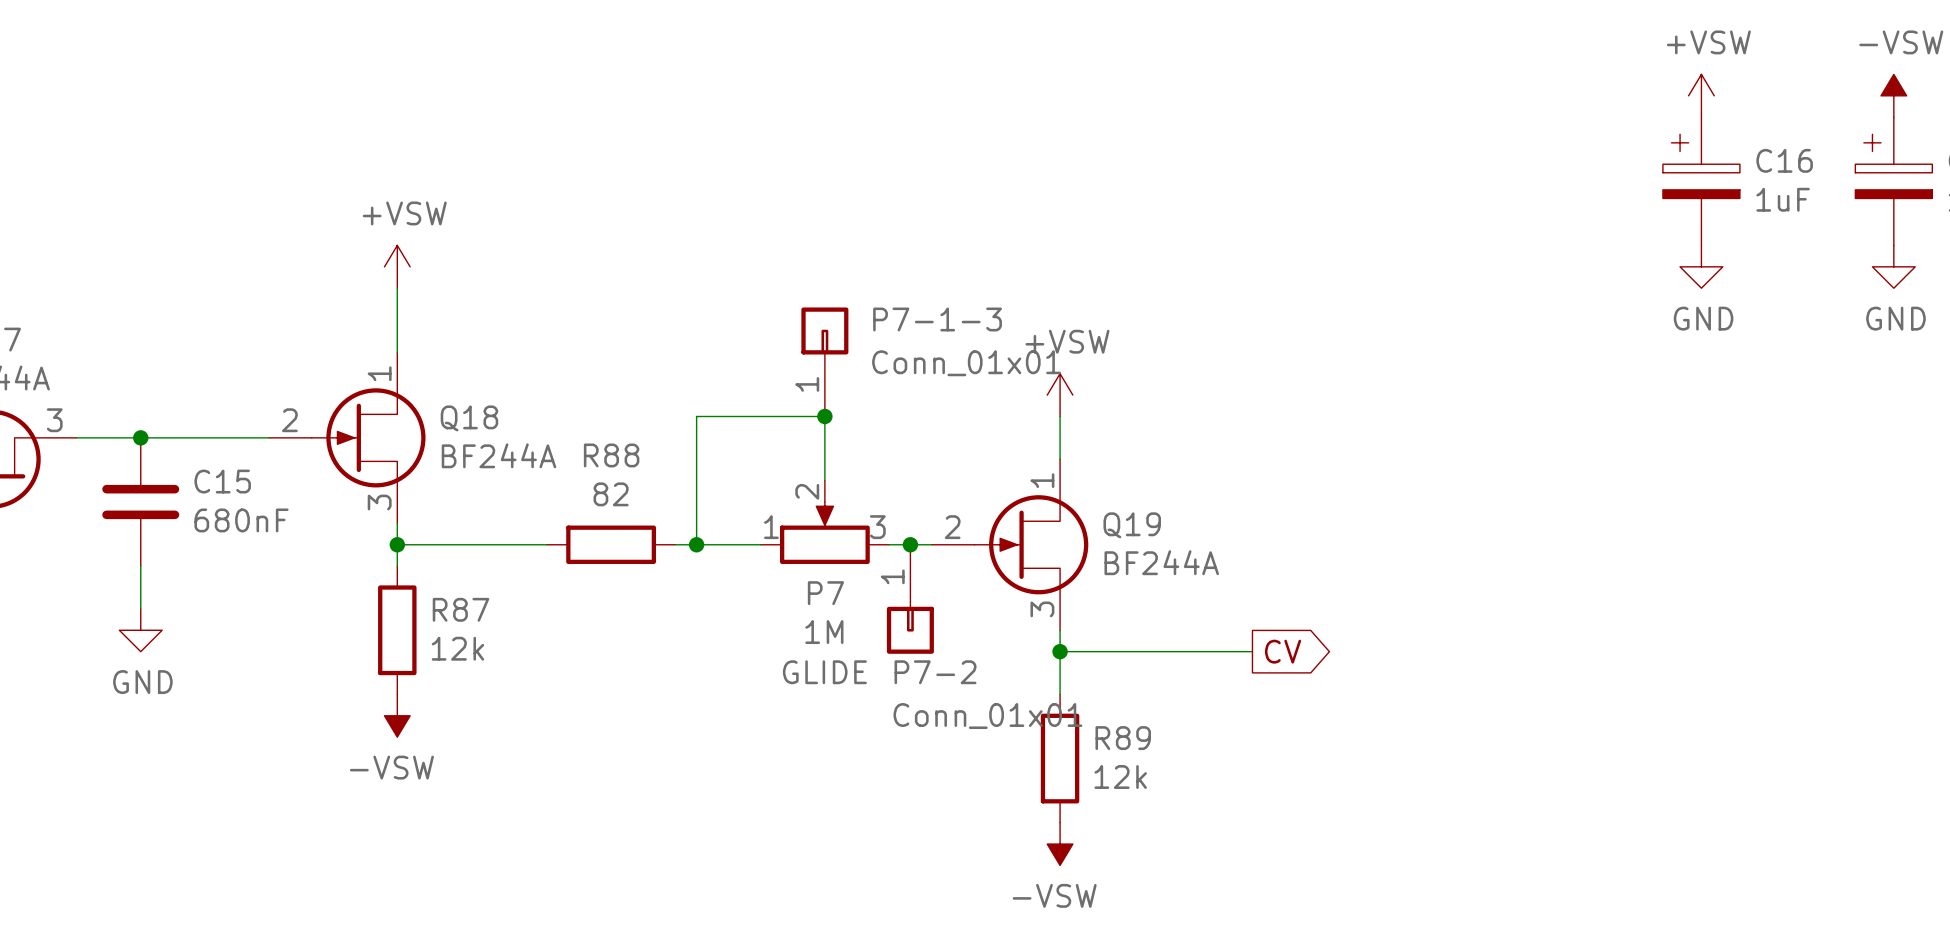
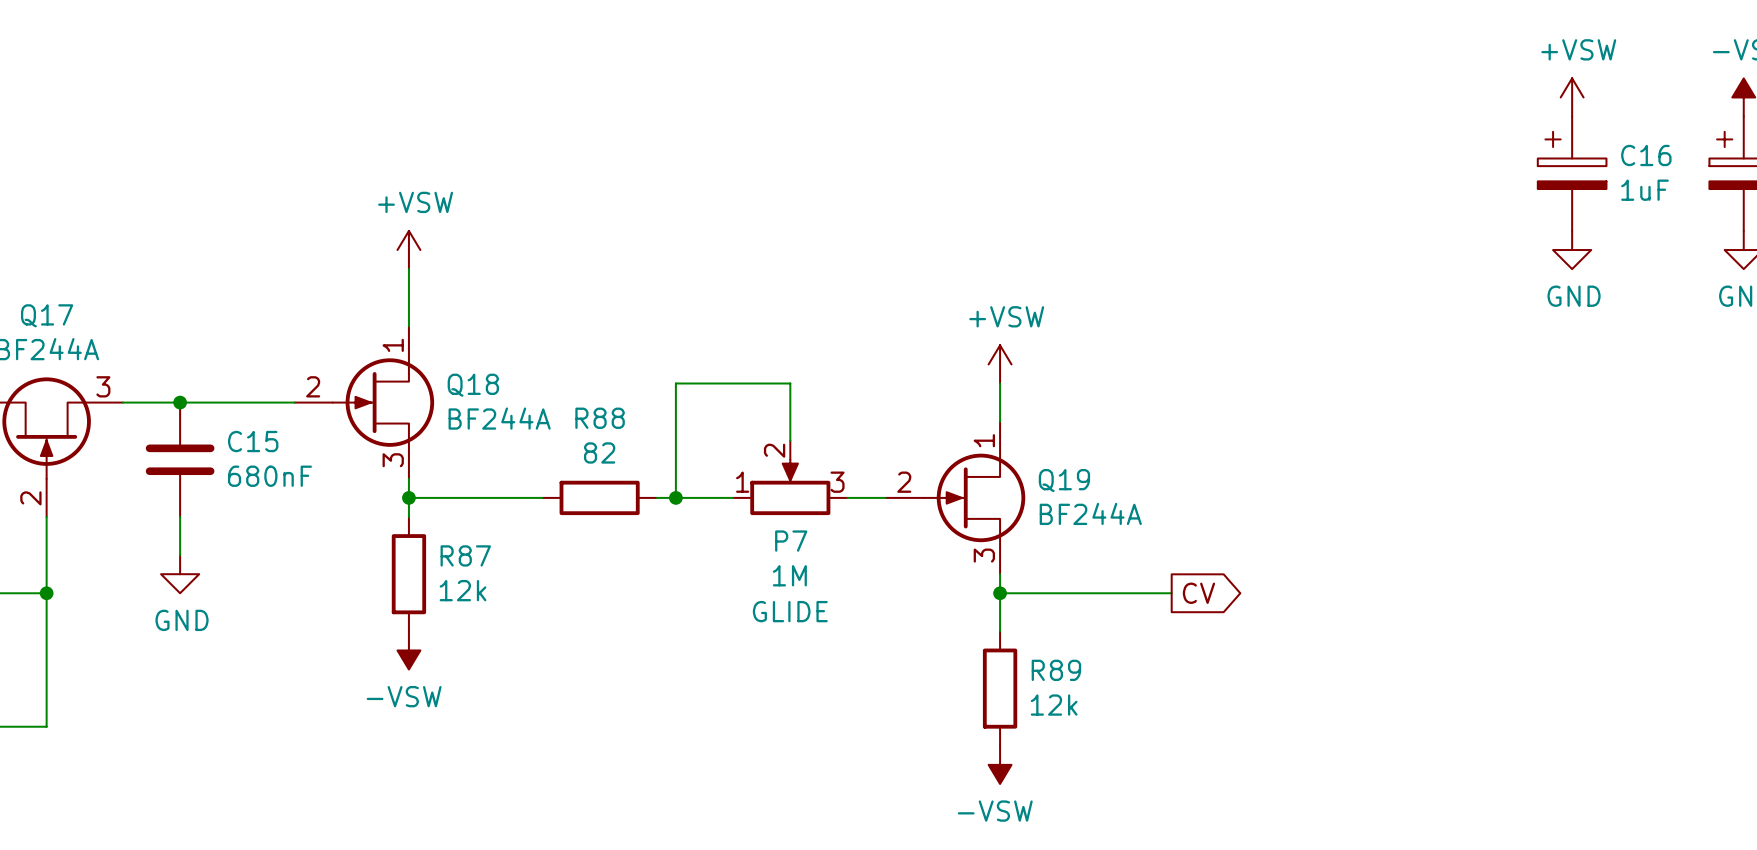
P7-1-3: Conn_01x01 (824, 361) -> none
junction: (824, 416) -> none
junction: (910, 544) -> none
P7-2: Conn_01x01 (910, 599) -> none

